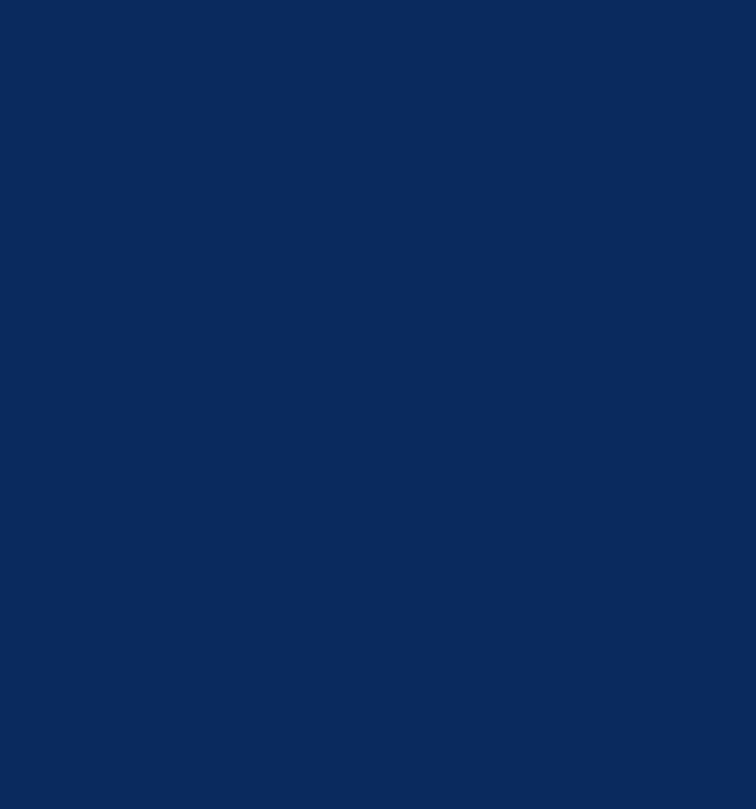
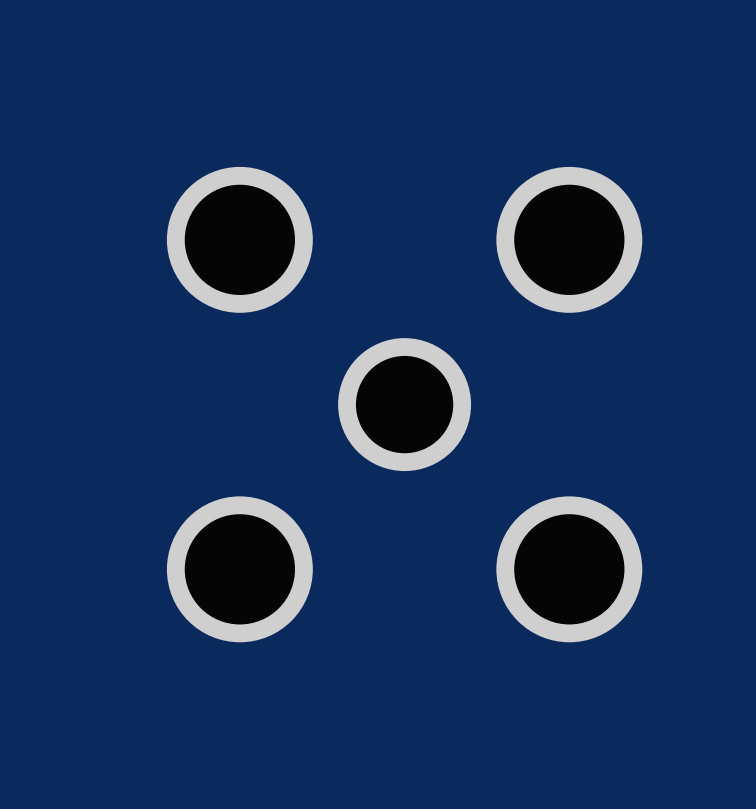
part: none -> (404, 404)

